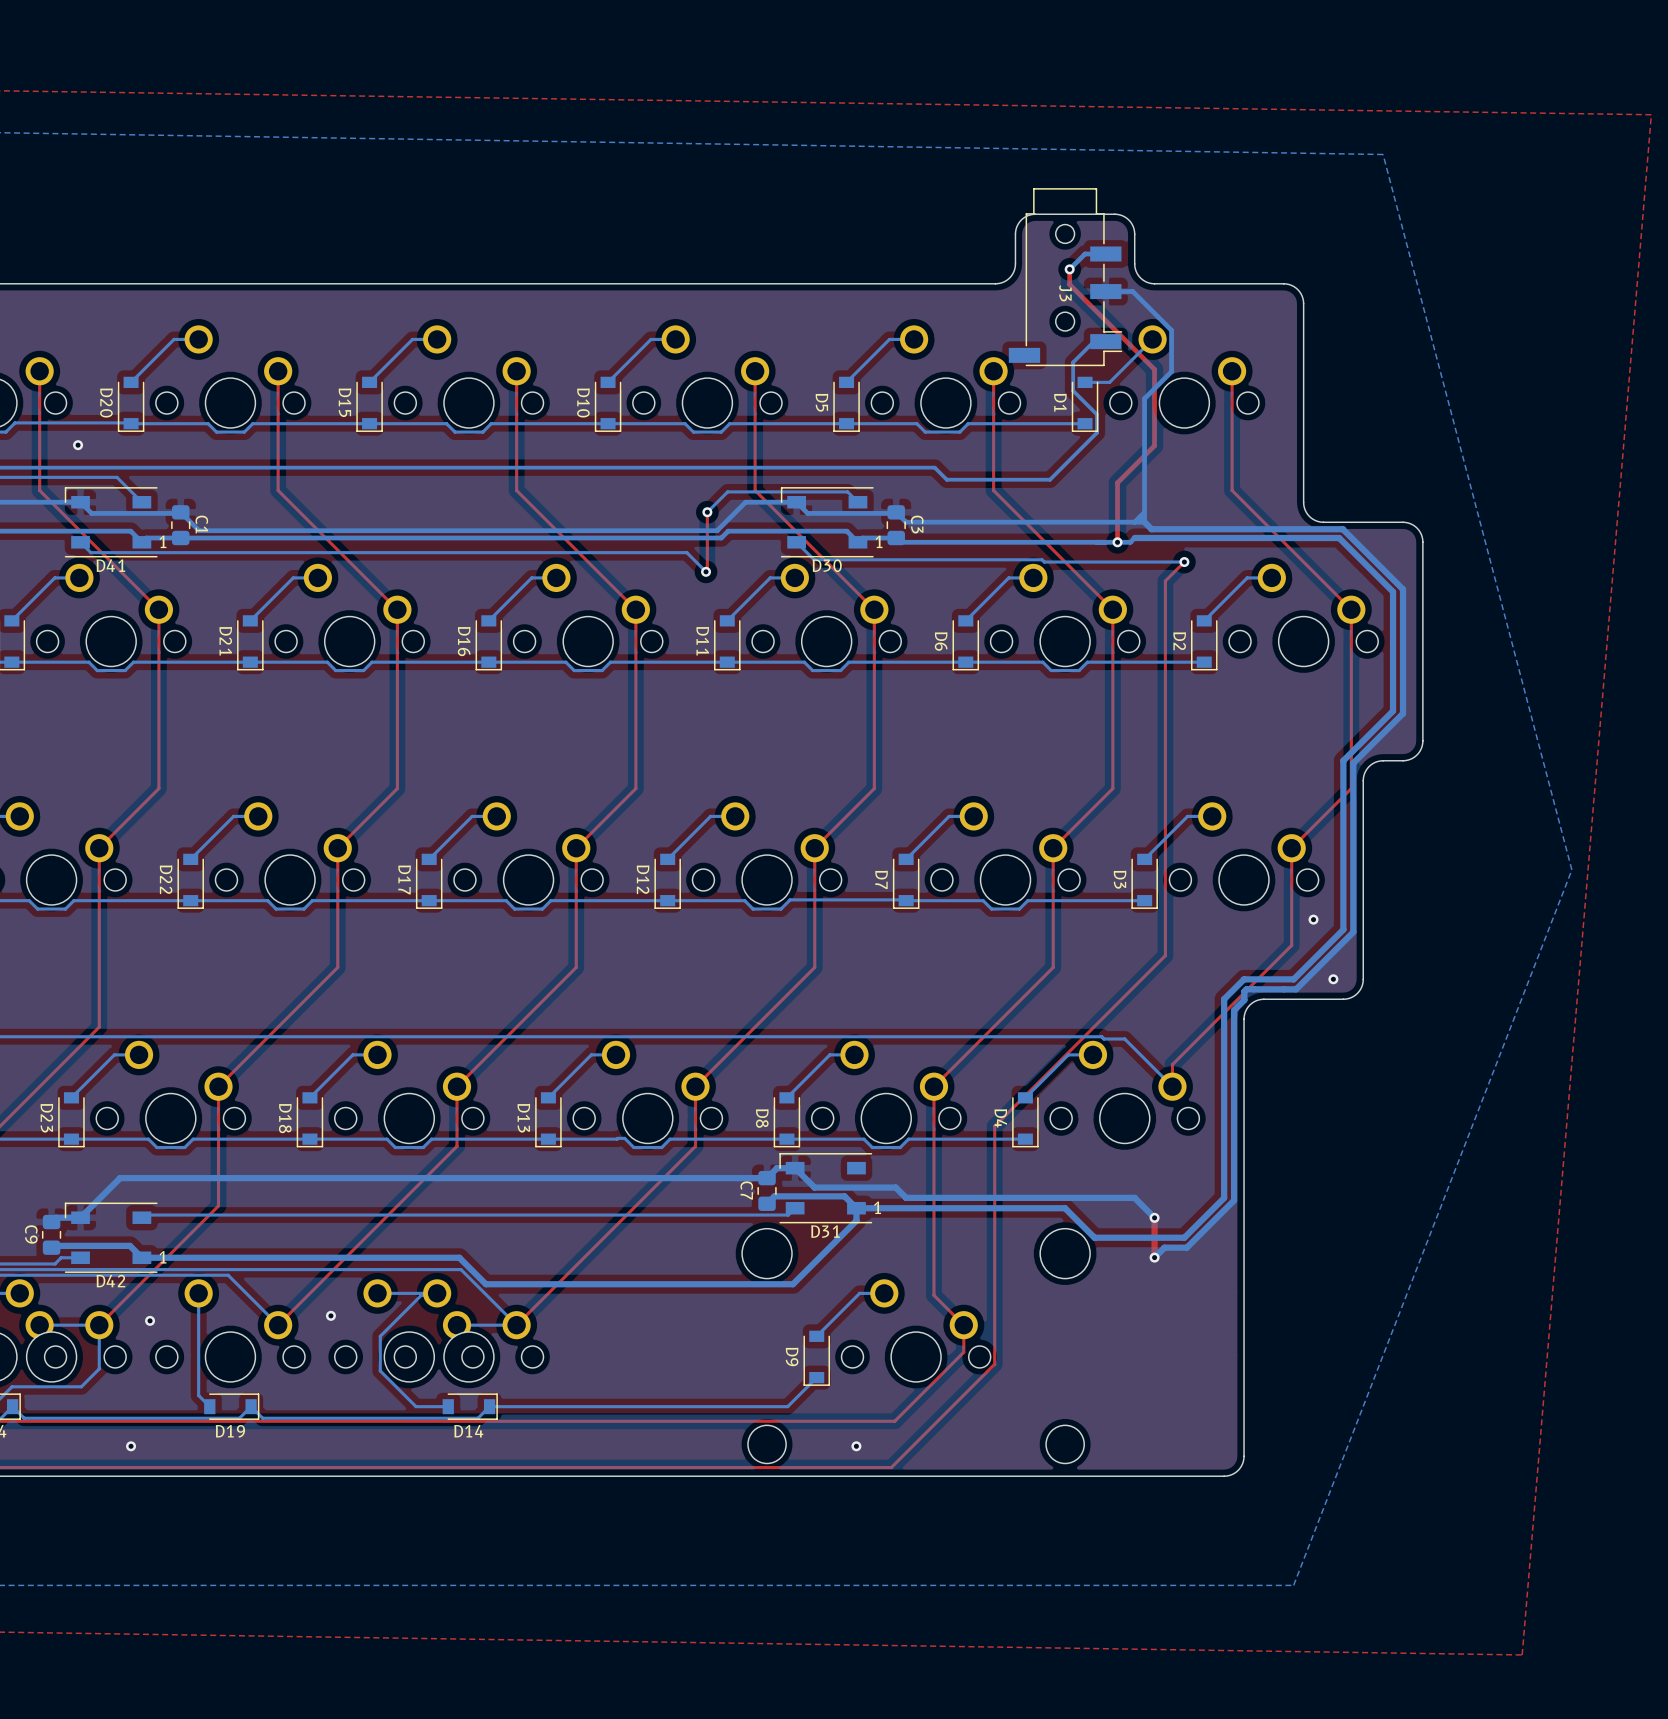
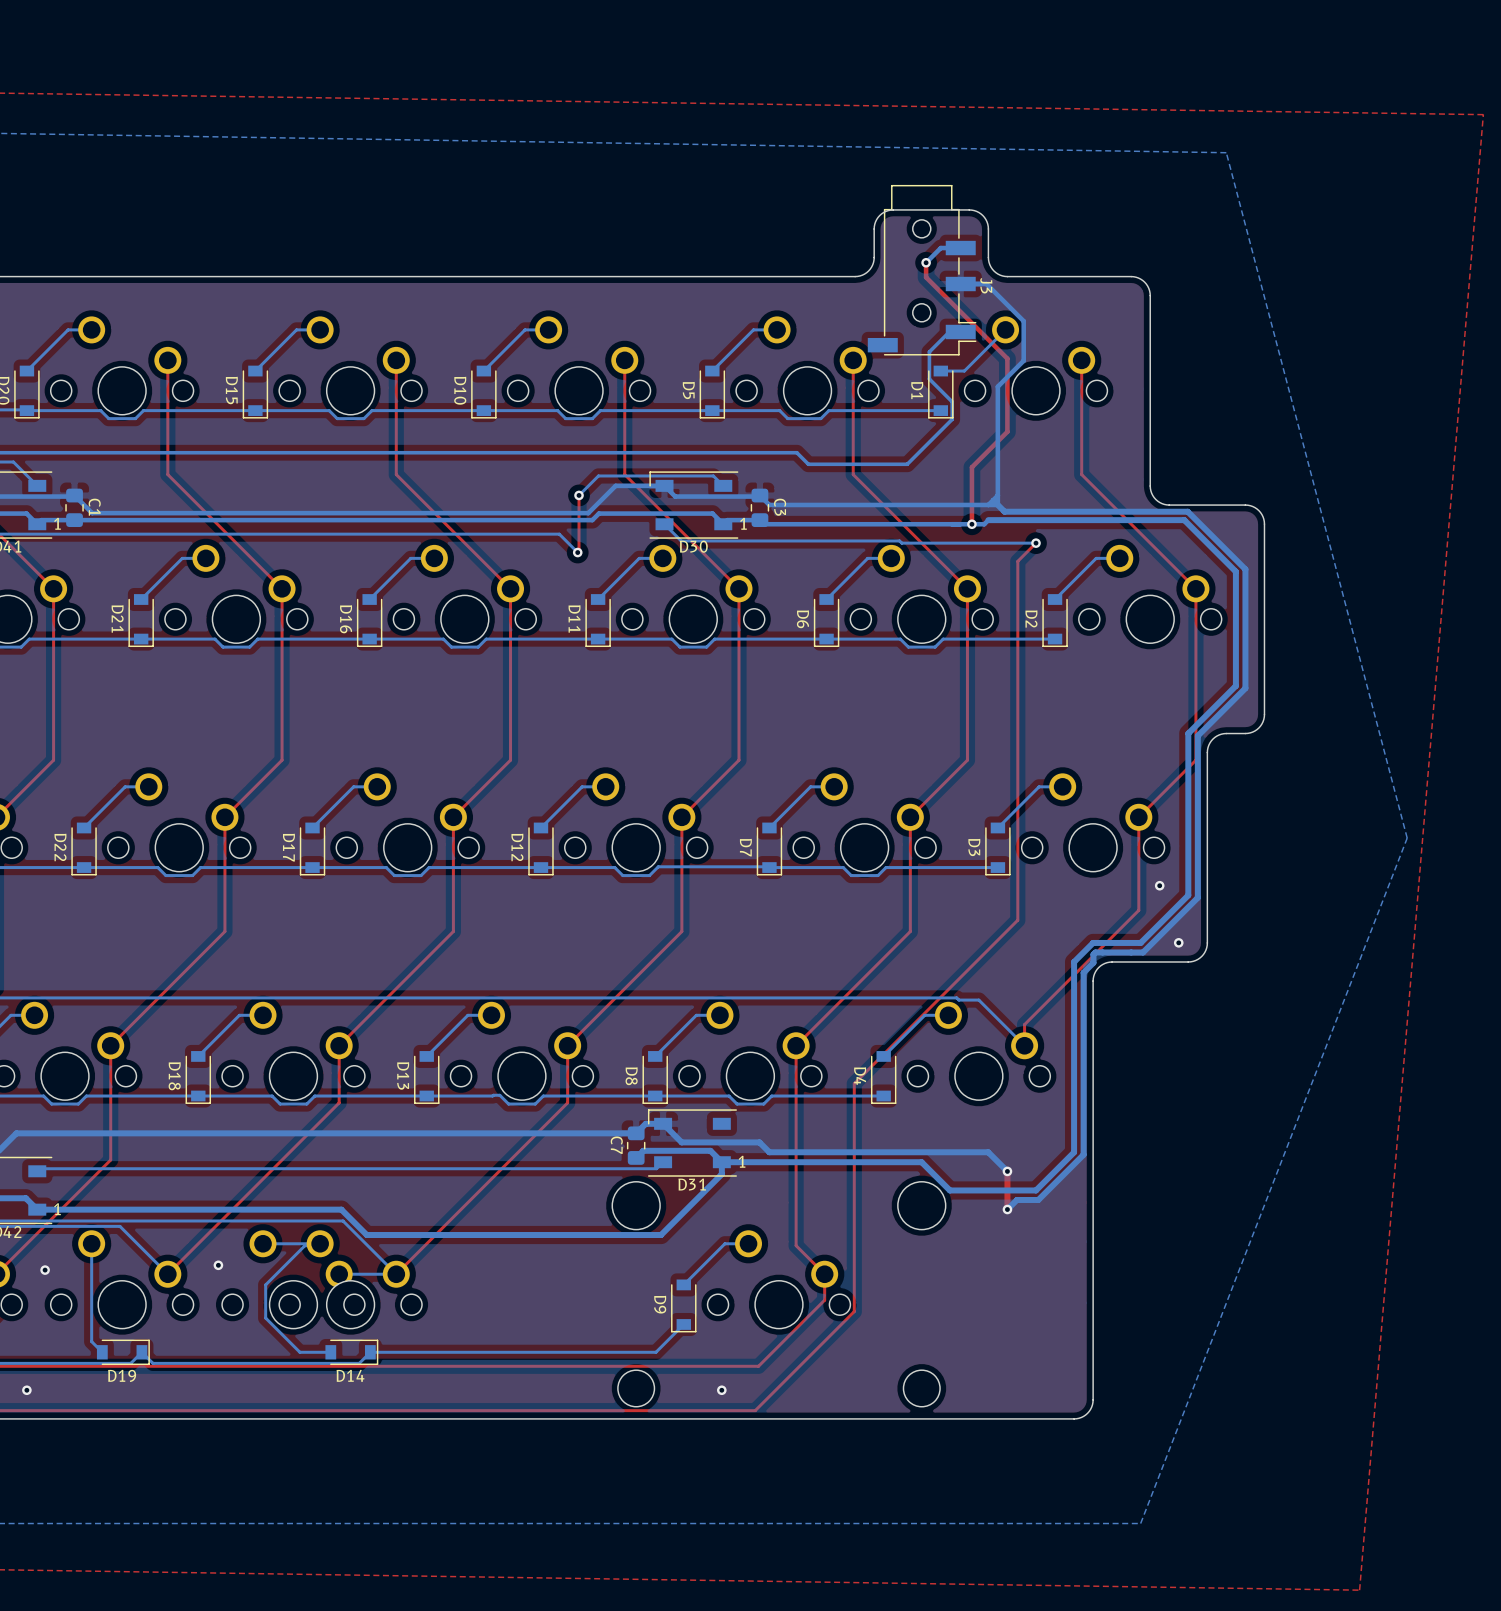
J3 name position: J3 (1065, 293) -> J3 (986, 285)

